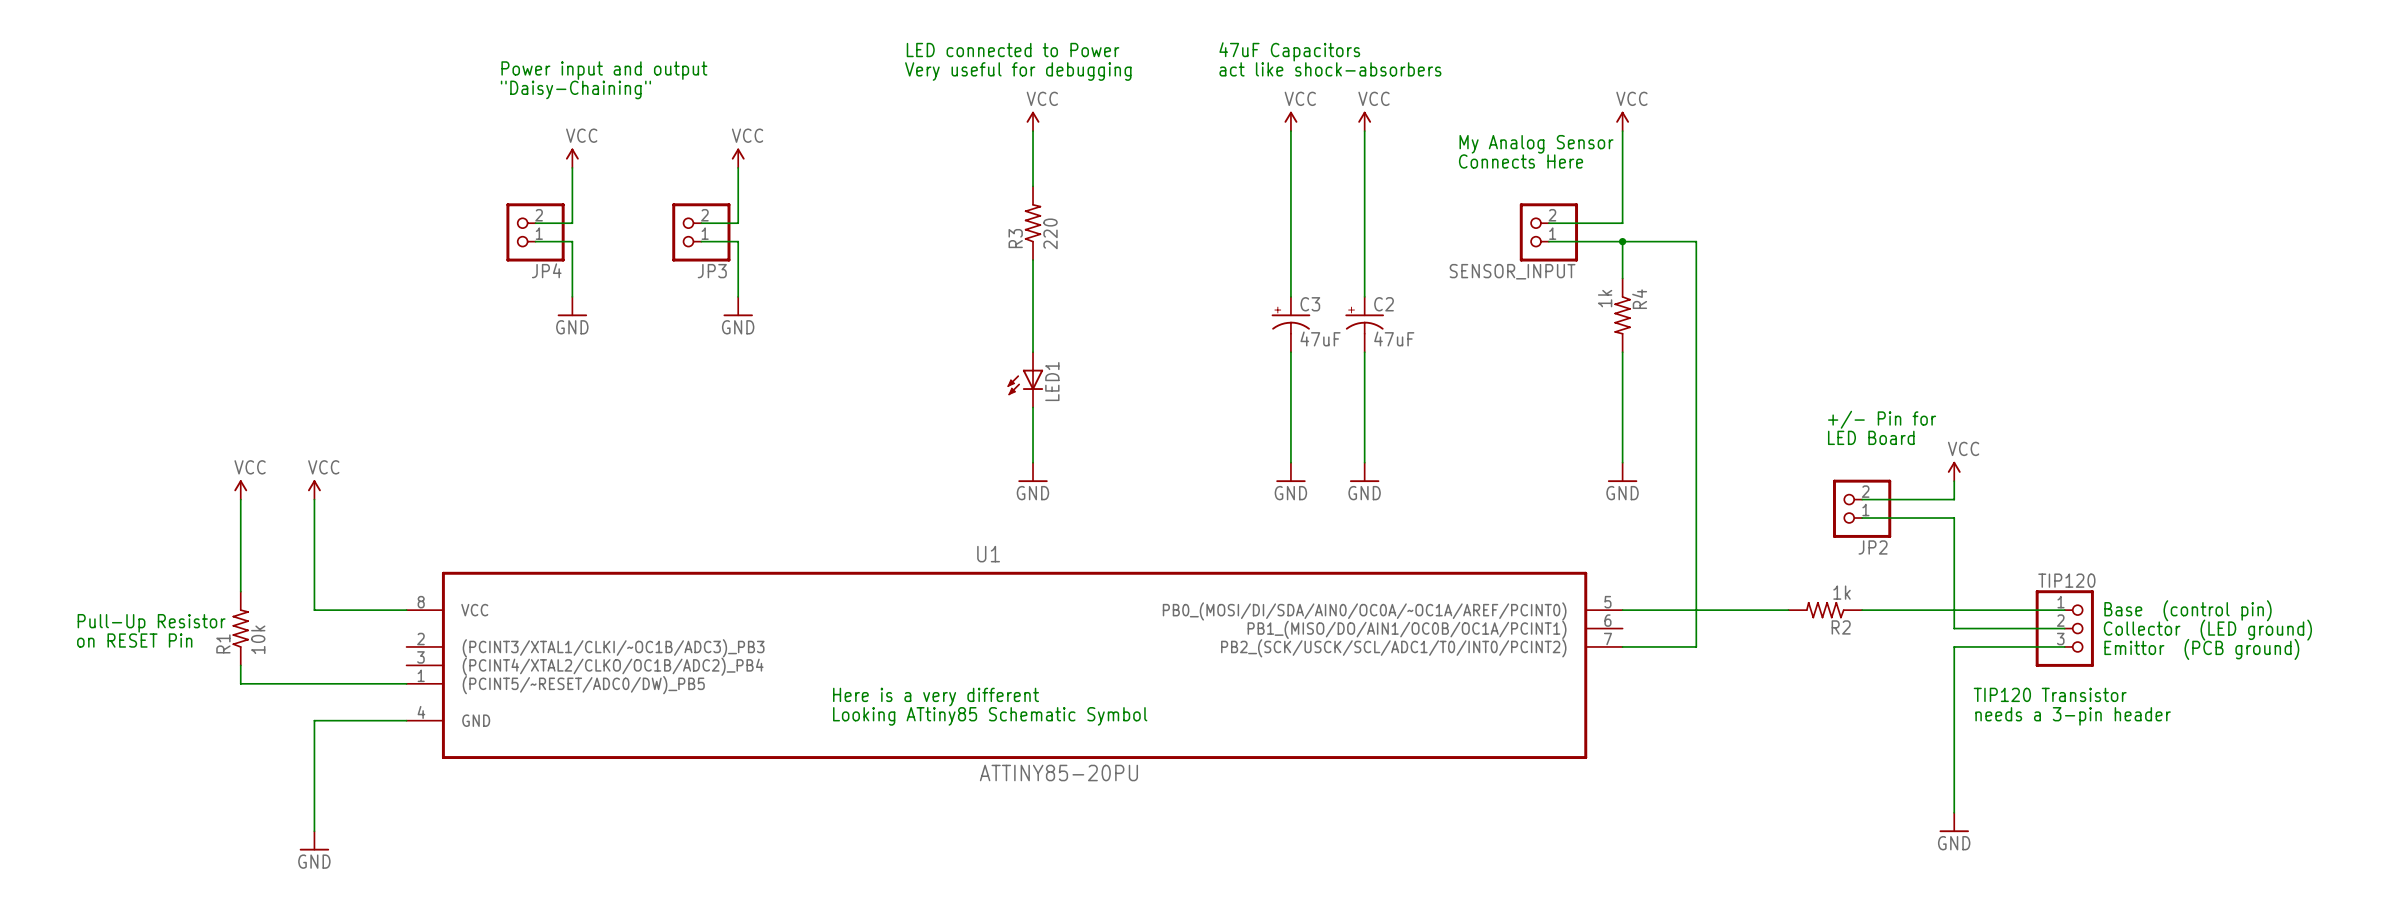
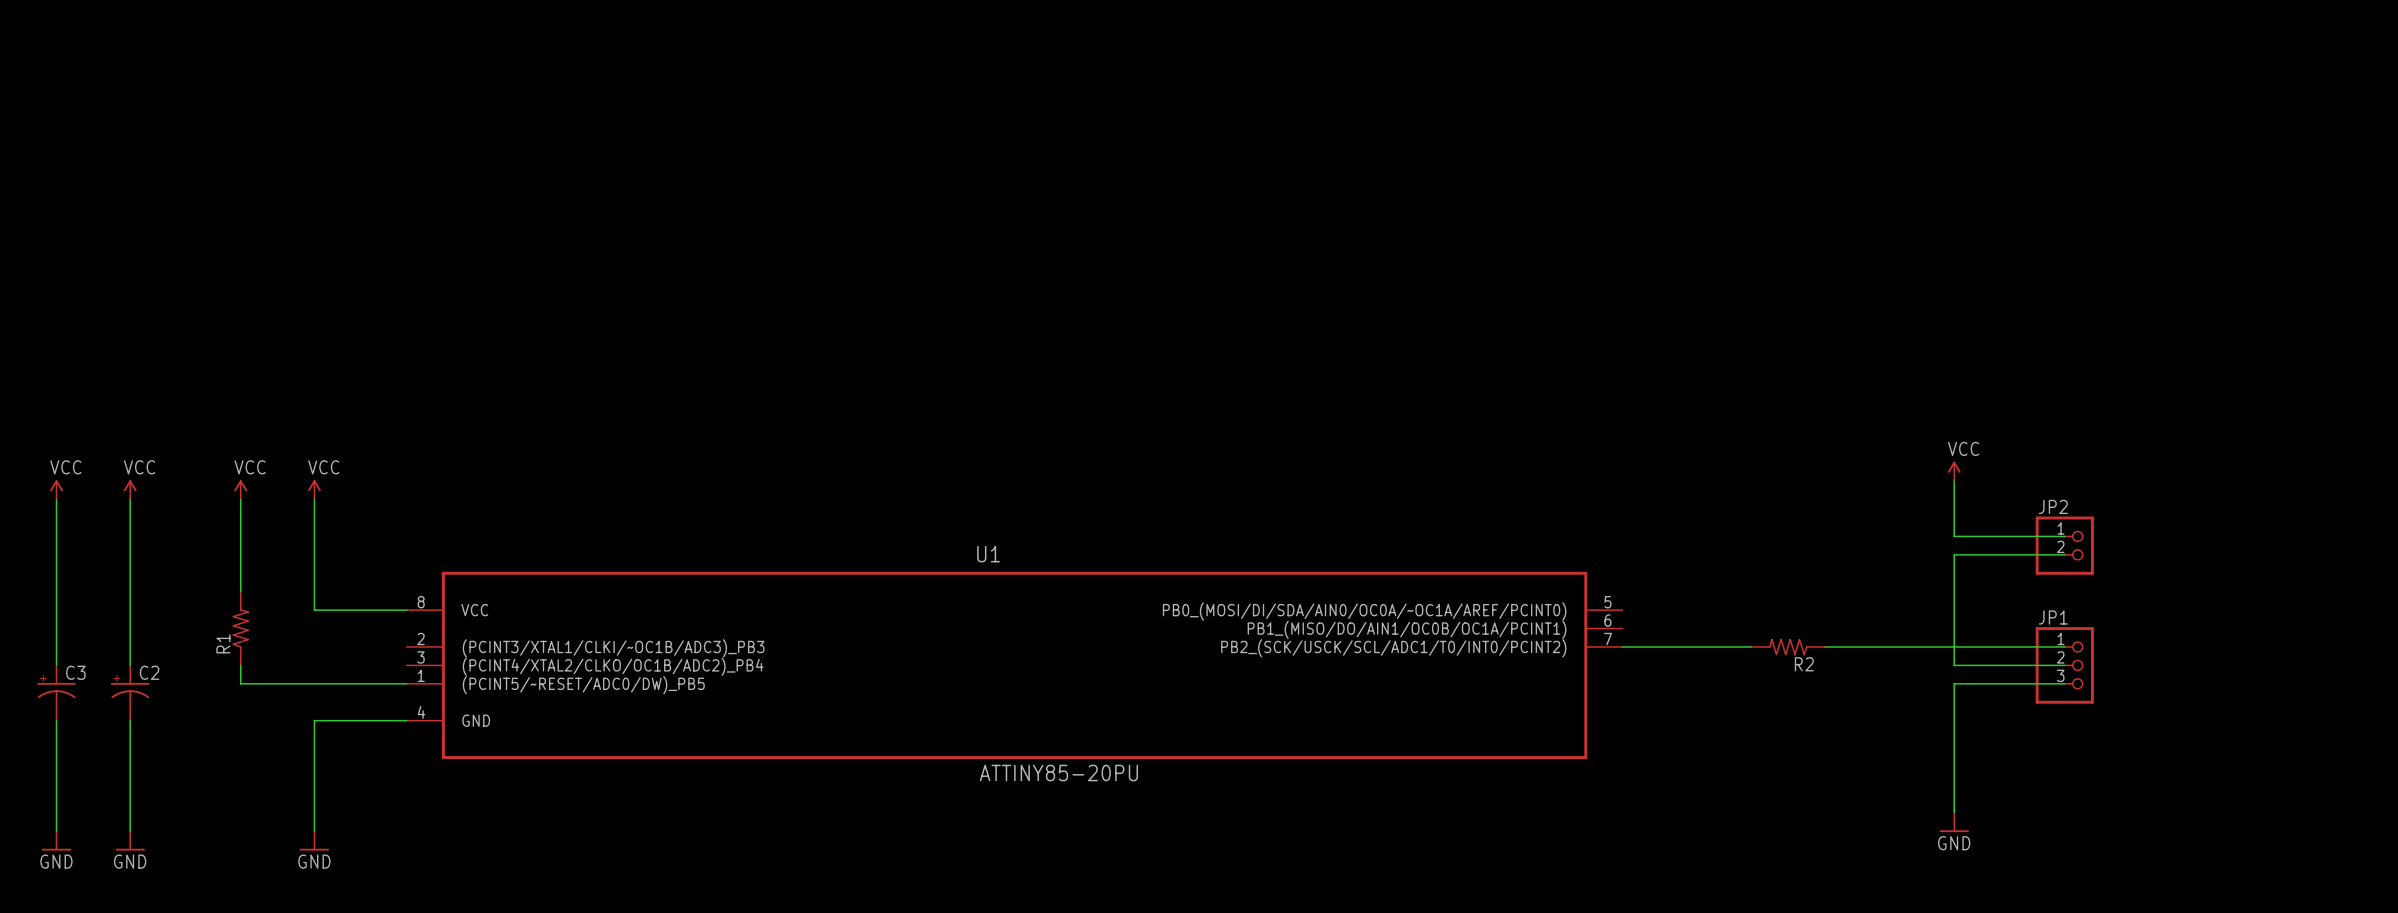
text: LED connected to Power (1013, 50) -> none
text: 47uF Capacitors (1289, 51) -> none
text: act like shock-absorbers (1330, 69) -> none
text: Power input and output (604, 70) -> none
text: Very useful for debugging (1018, 71) -> none
text: "Daisy-Chaining" (575, 89) -> none
power symbol: VCC (1033, 121) -> none
power symbol: VCC (1290, 121) -> none
power symbol: VCC (1364, 121) -> none
power symbol: VCC (1622, 121) -> none
wire: (1033, 131) (1033, 186) -> none
wire: (1290, 131) (1290, 296) -> none
wire: (1364, 131) (1364, 296) -> none
wire: (1622, 131) (1622, 223) (1548, 223) -> none
text: My Analog Sensor (1536, 144) -> none
power symbol: VCC (572, 158) -> none
power symbol: VCC (738, 158) -> none
text: Connects Here (1521, 161) -> none
wire: (572, 167) (572, 223) (535, 223) -> none
wire: (738, 167) (738, 223) (701, 223) -> none
R3: 220 (1033, 223) -> none
JP4: (535, 232) -> none
JP3: (701, 232) -> none
SENSOR_INPUT: (1548, 232) -> none
wire: (535, 241) (572, 241) (572, 296) -> none
wire: (701, 241) (738, 241) (738, 296) -> none
wire: (1548, 241) (1696, 241) (1696, 646) -> (1751, 646) (1696, 646)
wire: (1622, 241) (1622, 278) -> none
junction: (1622, 241) -> none
wire: (1033, 260) (1033, 352) -> none
power symbol: GND (572, 306) -> none
power symbol: GND (738, 306) -> none
R4: 1k (1622, 315) -> none
C3 position: (1290, 324) -> (56, 693)
C2 position: (1364, 324) -> (130, 693)
C3 value: 47uF (1320, 338) -> none
C2 value: 47uF (1394, 338) -> none
wire: (1290, 352) (1290, 462) -> none
wire: (1364, 352) (1364, 462) -> none
wire: (1622, 352) (1622, 462) -> none
LED1: (1025, 379) -> none
wire: (1033, 407) (1033, 462) -> none
text: +/- Pin for (1882, 419) -> none
text: LED Board (1871, 437) -> none
power symbol: GND (1033, 472) -> none
power symbol: GND (1290, 472) -> none
power symbol: GND (1364, 472) -> none
power symbol: GND (1622, 472) -> none
power symbol: none -> VCC (56, 489)
power symbol: none -> VCC (130, 489)
wire: none -> (56, 499) (56, 665)
wire: none -> (130, 499) (130, 665)
wire: (1862, 499) (1954, 499) -> (1954, 518) (1954, 499)
JP2 rotation: 0° (1862, 508) -> 180° (2064, 545)
JP2 position: (1862, 508) -> (2064, 545)
wire: (1862, 518) (1954, 518) -> none
wire: (1954, 536) (1954, 554) -> (1954, 536) (2064, 536)
wire: none -> (1954, 554) (2064, 554)
R2 value: 1k (1842, 592) -> none
wire: (1622, 610) (1788, 610) -> none
R2 position: (1825, 610) -> (1788, 646)
wire: (1862, 610) (2064, 610) -> none
text: Base (control pin) (2188, 610) -> none
text: Pull-Up Resistor (151, 623) -> none
wire: (1954, 628) (2064, 628) -> (1954, 628) (1954, 646) (1825, 646)
TIP120: (2064, 628) -> none
text: Collector (LED ground) (2207, 630) -> none
R1 value: 10k (258, 639) -> none
text: on RESET Pin (134, 640) -> none
text: Emittor (PCB ground) (2201, 649) -> none
wire: (1954, 665) (1954, 683) -> (1954, 665) (2064, 665)
JP1: none -> (2064, 665)
wire: none -> (1954, 683) (2064, 683)
text: TIP120 Transistor (2050, 694) -> none
text: Here is a very different (936, 697) -> none
text: Looking ATtiny85 Schematic Symbol (990, 716) -> none
text: needs a 3-pin header (2073, 716) -> none
wire: none -> (56, 720) (56, 831)
wire: none -> (130, 720) (130, 831)
power symbol: none -> GND (56, 840)
power symbol: none -> GND (130, 840)

